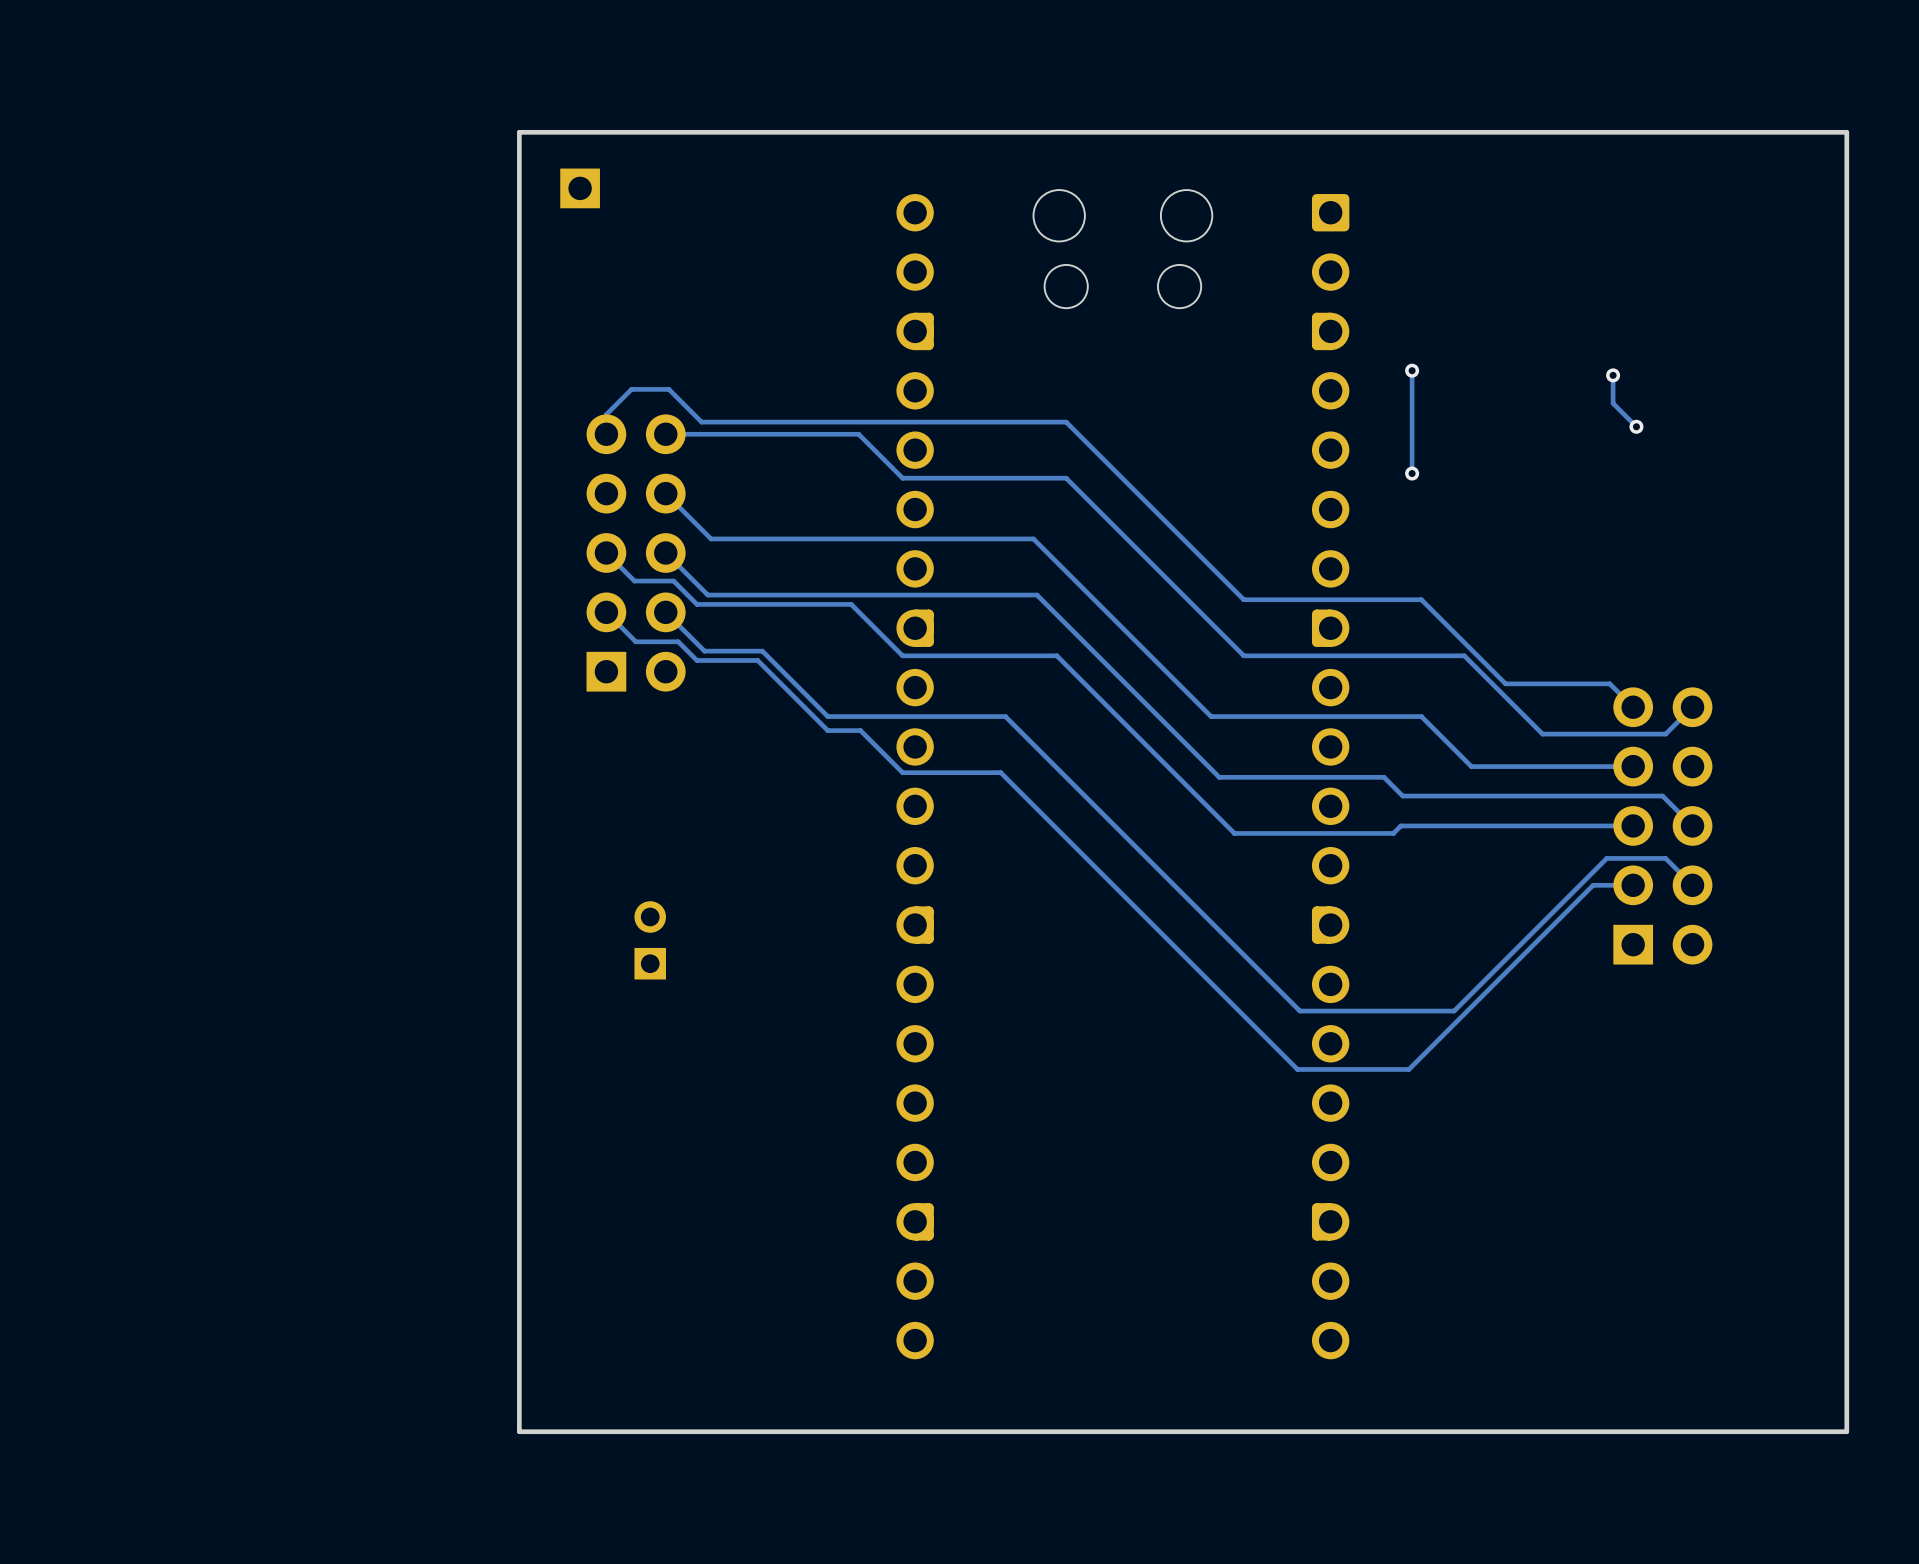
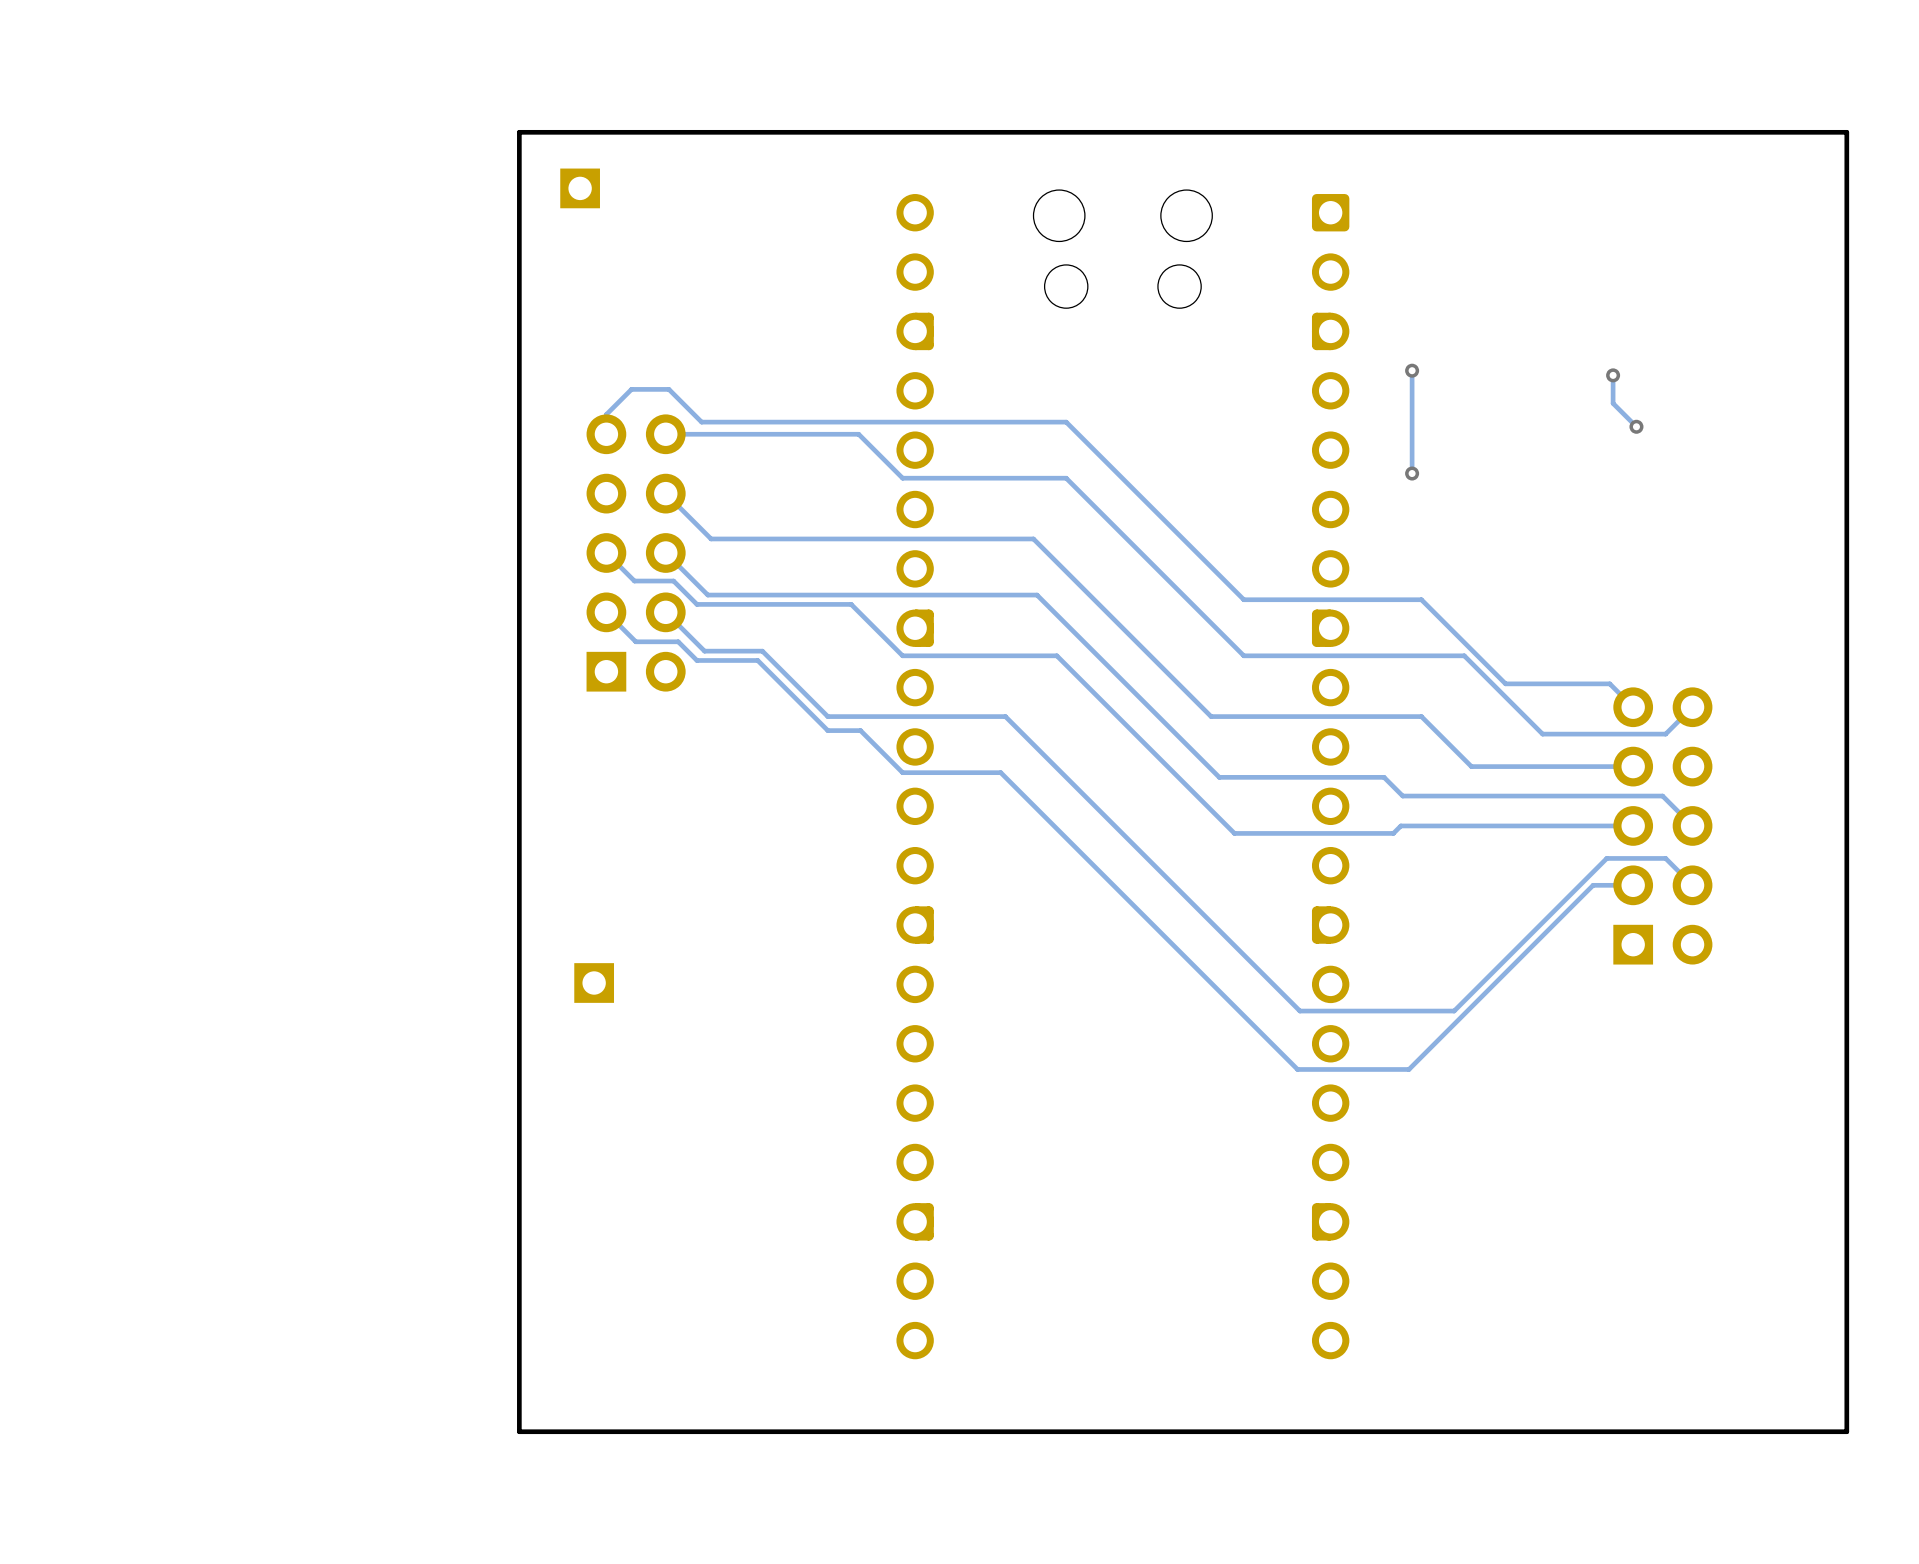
part: (650, 940) -> none
part: none -> (594, 983)

